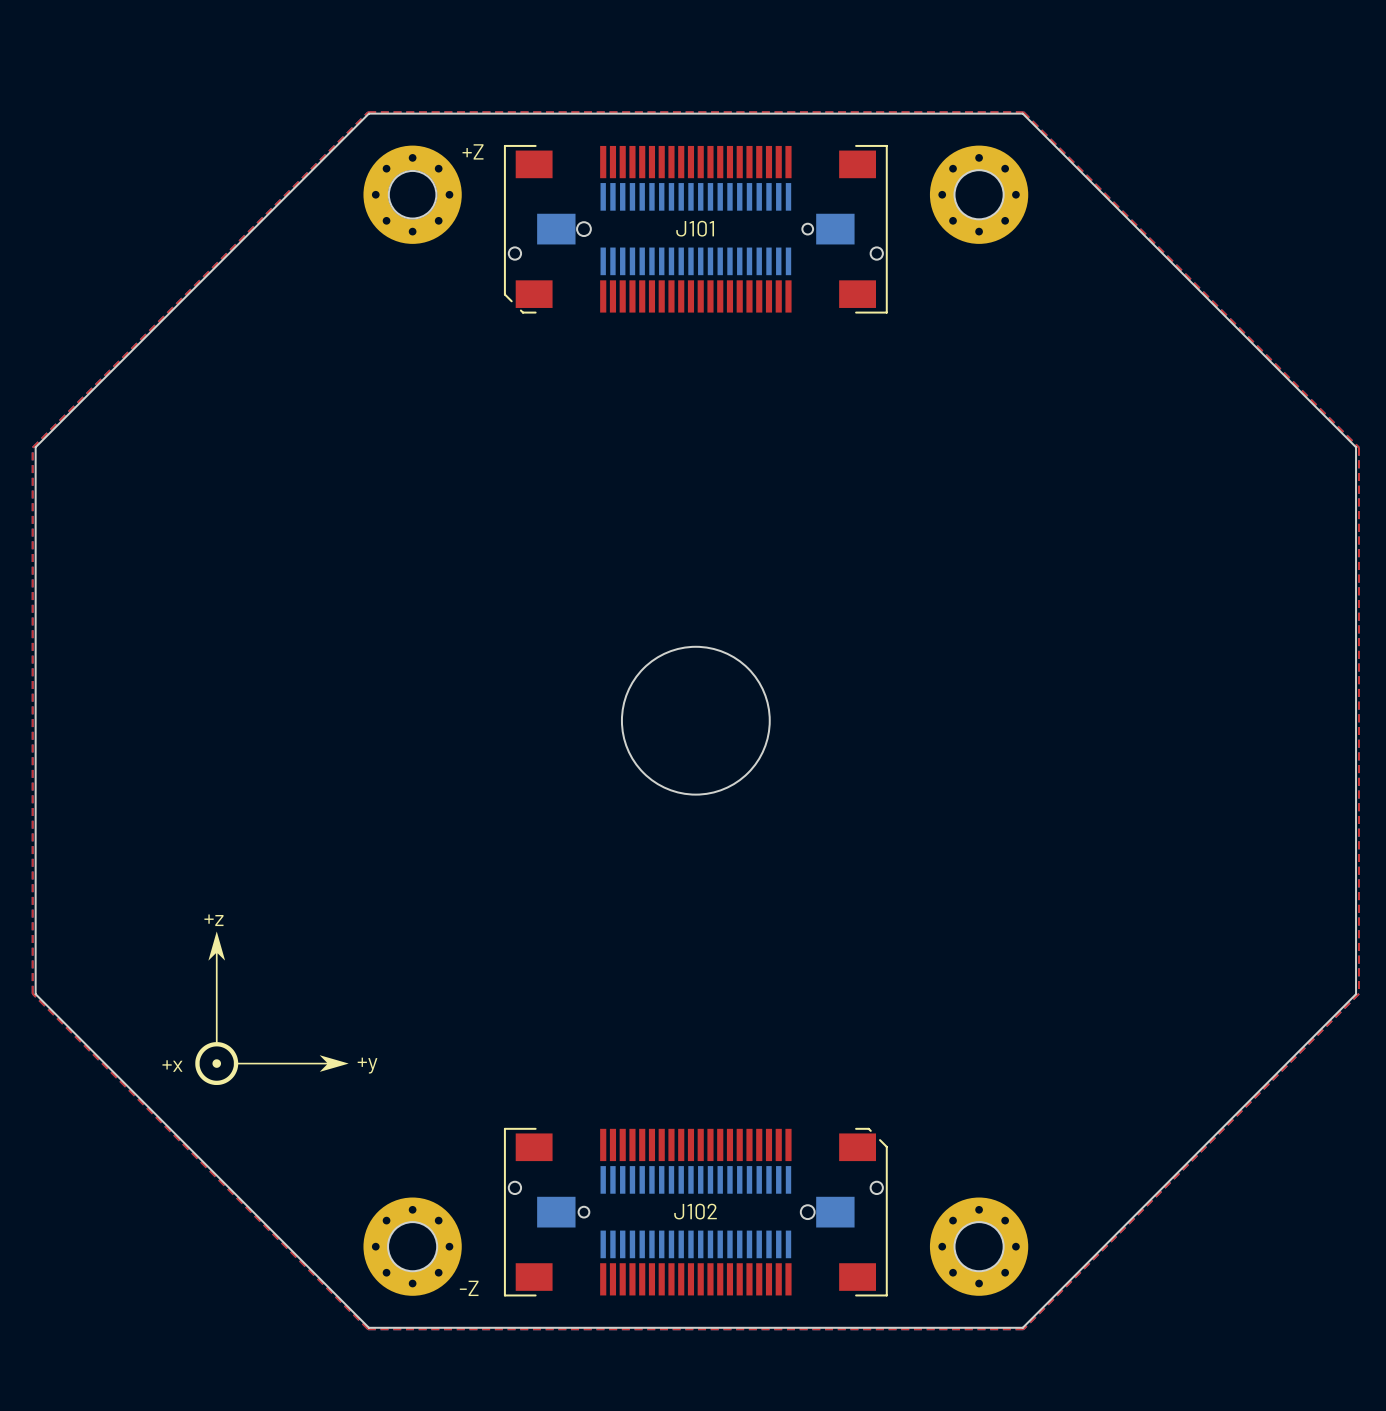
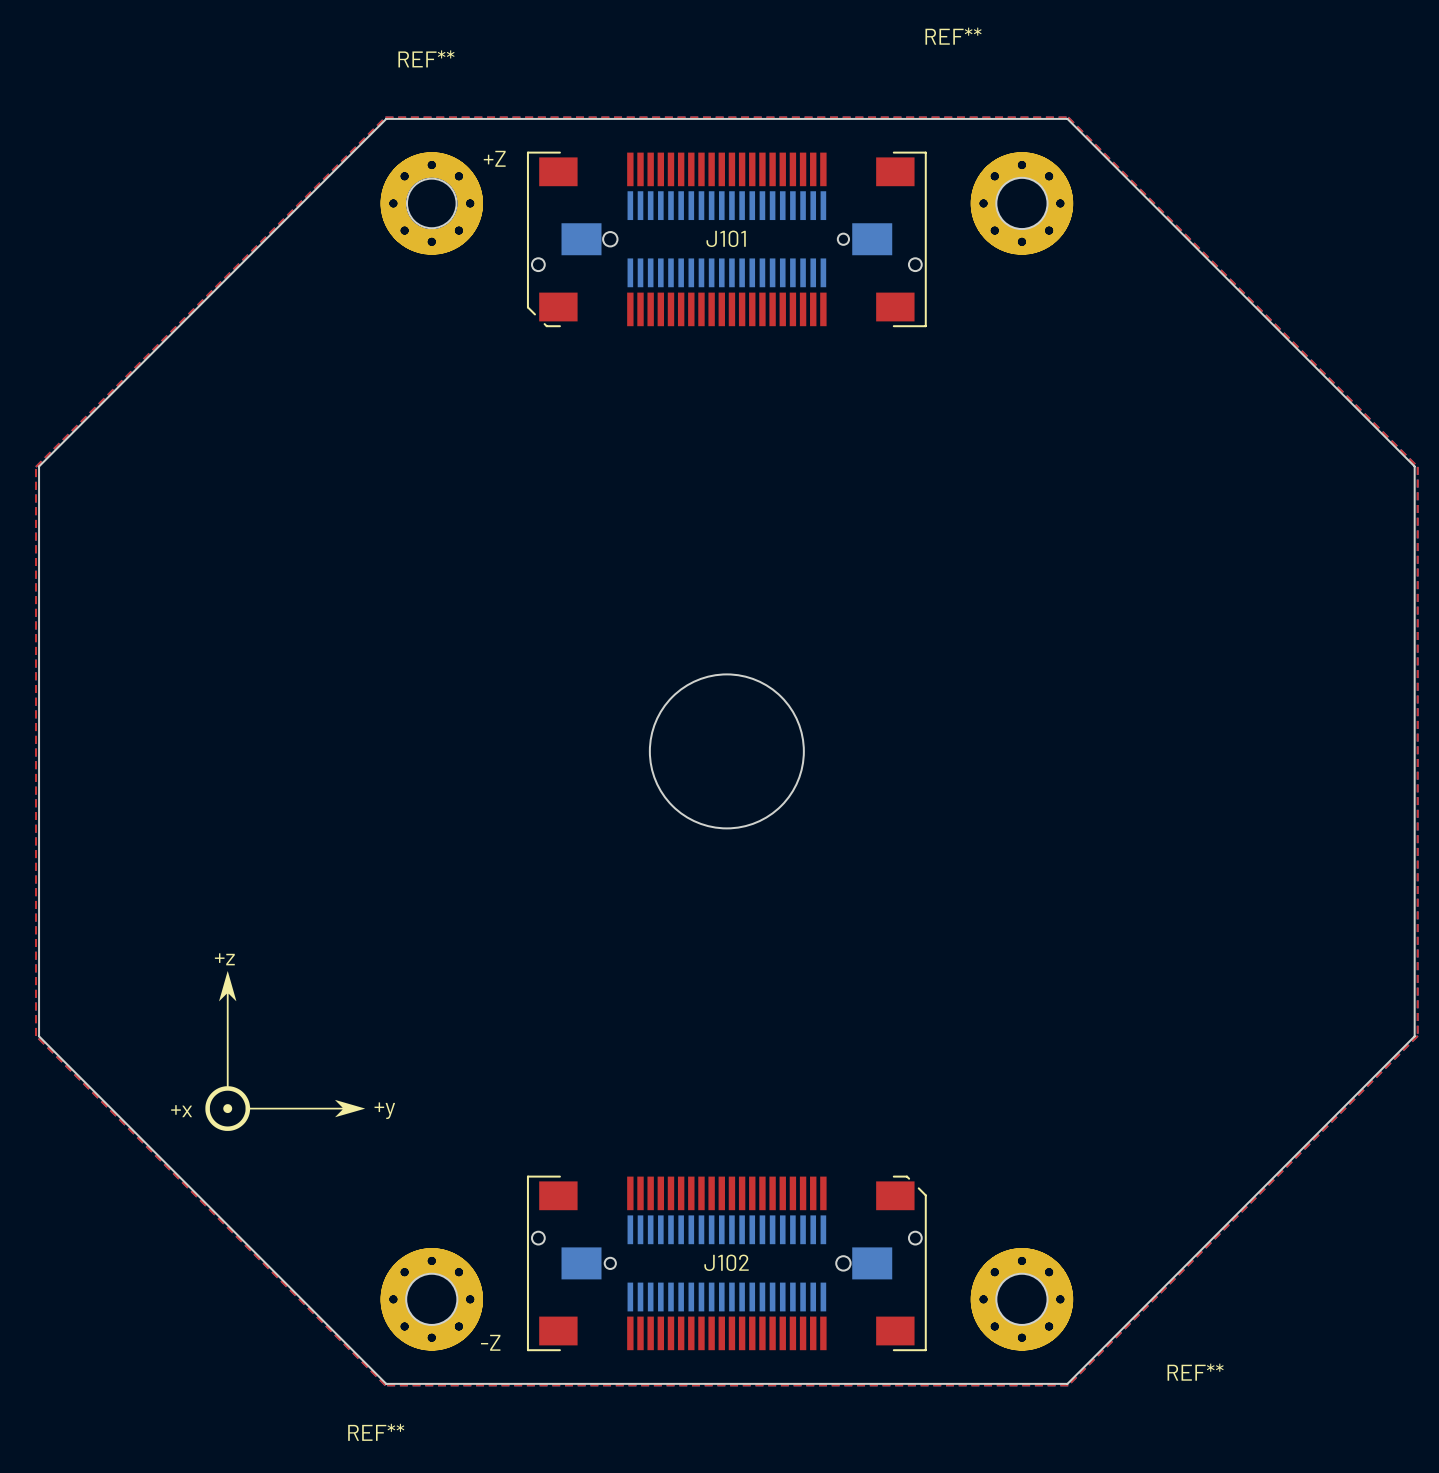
REF**: none -> (431, 203)
REF**: none -> (1021, 203)
REF**: none -> (431, 1299)
REF**: none -> (1021, 1299)

